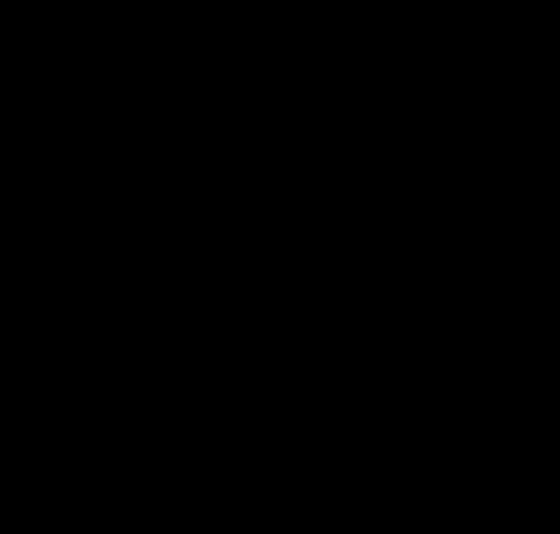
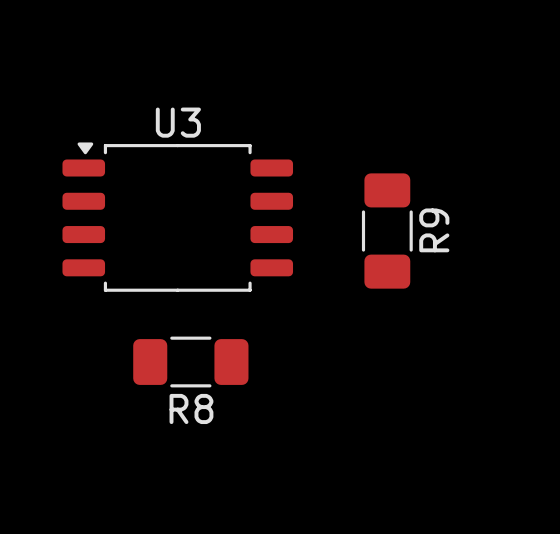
U3: none -> (177, 217)
R9: none -> (387, 231)
R8: none -> (190, 362)

